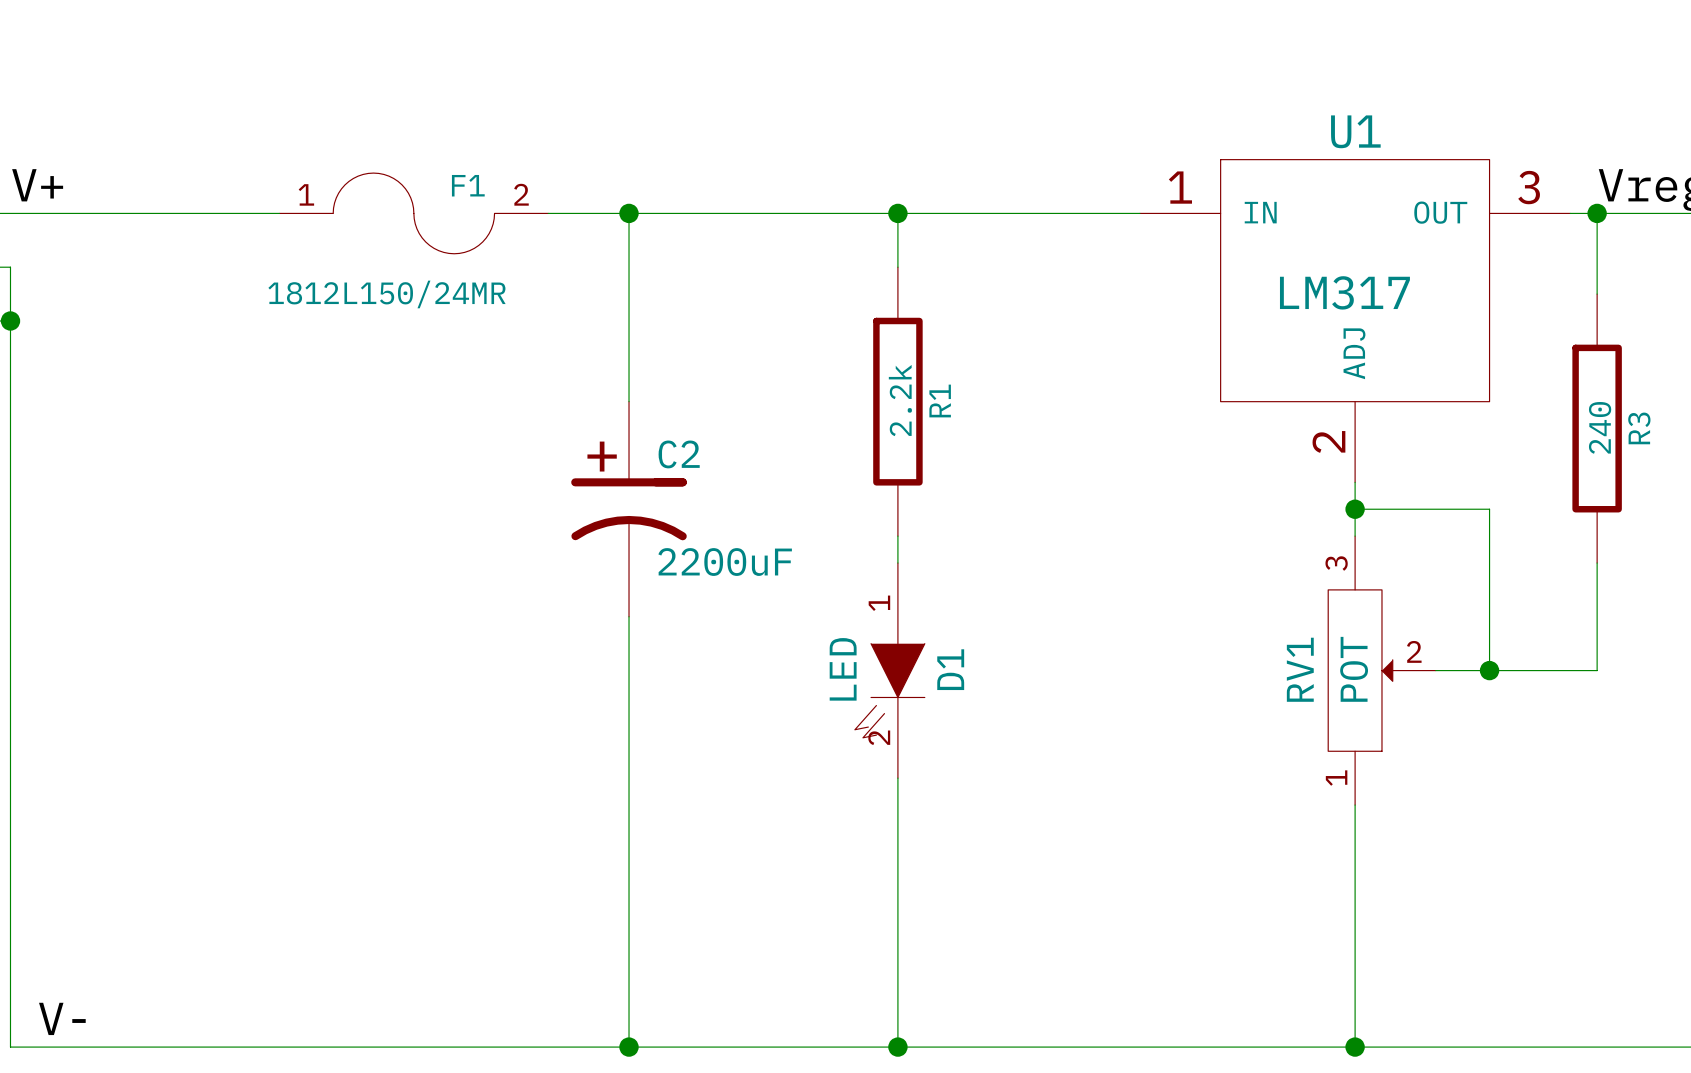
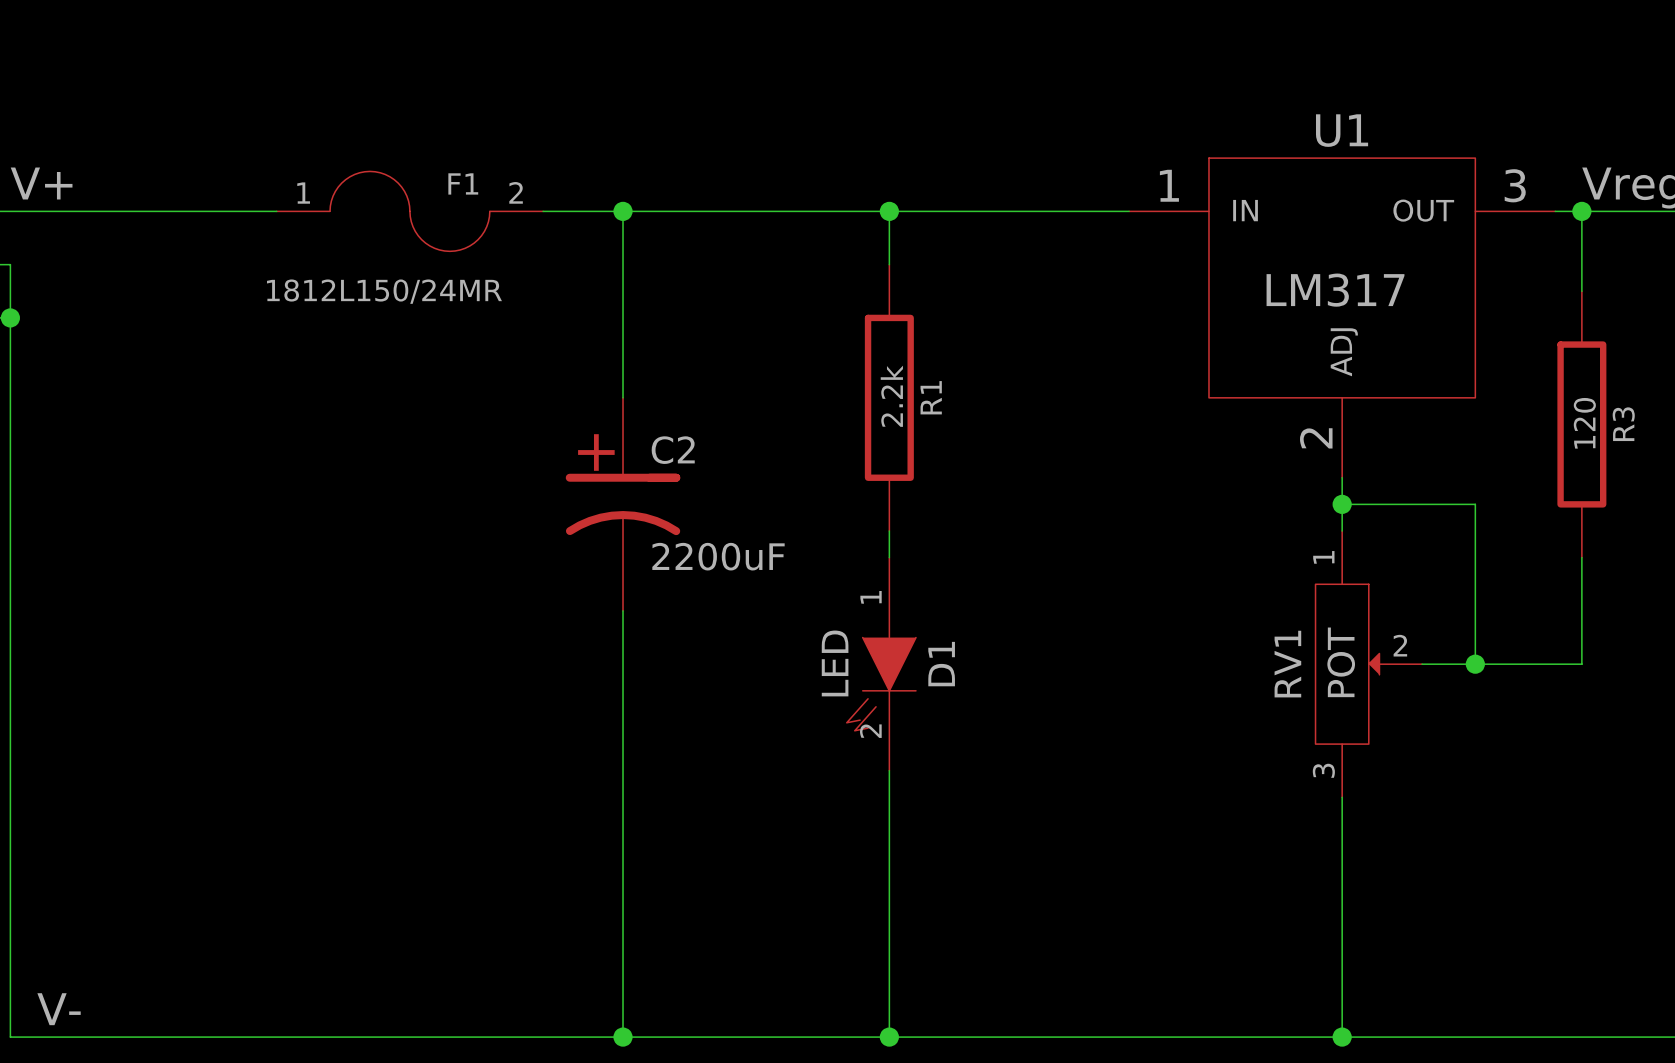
R3 value: 240 (1600, 427) -> 120 (1584, 423)
RV1 flip: as is (1360, 670) -> up-down (1347, 664)

